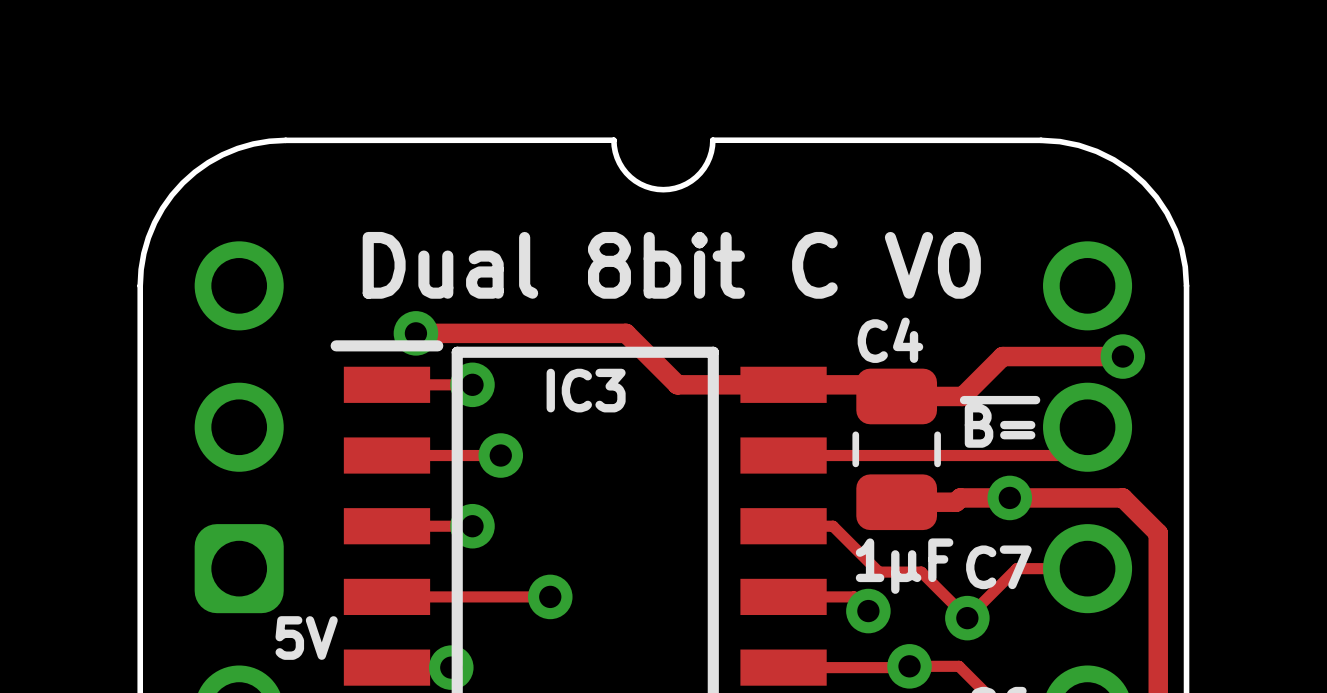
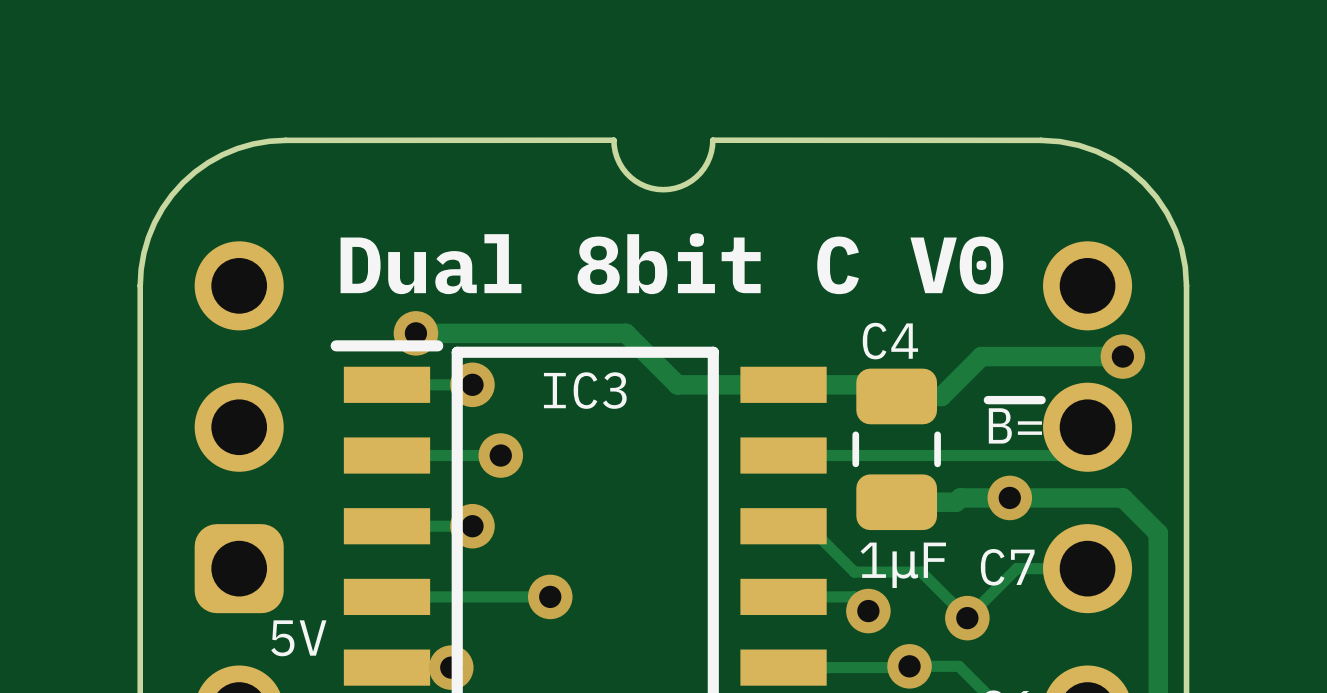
track: (1002, 356) (962, 396) (941, 396) -> (1002, 356) (981, 356) (941, 396)
track: (783, 526) (833, 526) (878, 572) -> (808, 526) (854, 572) (878, 572)

